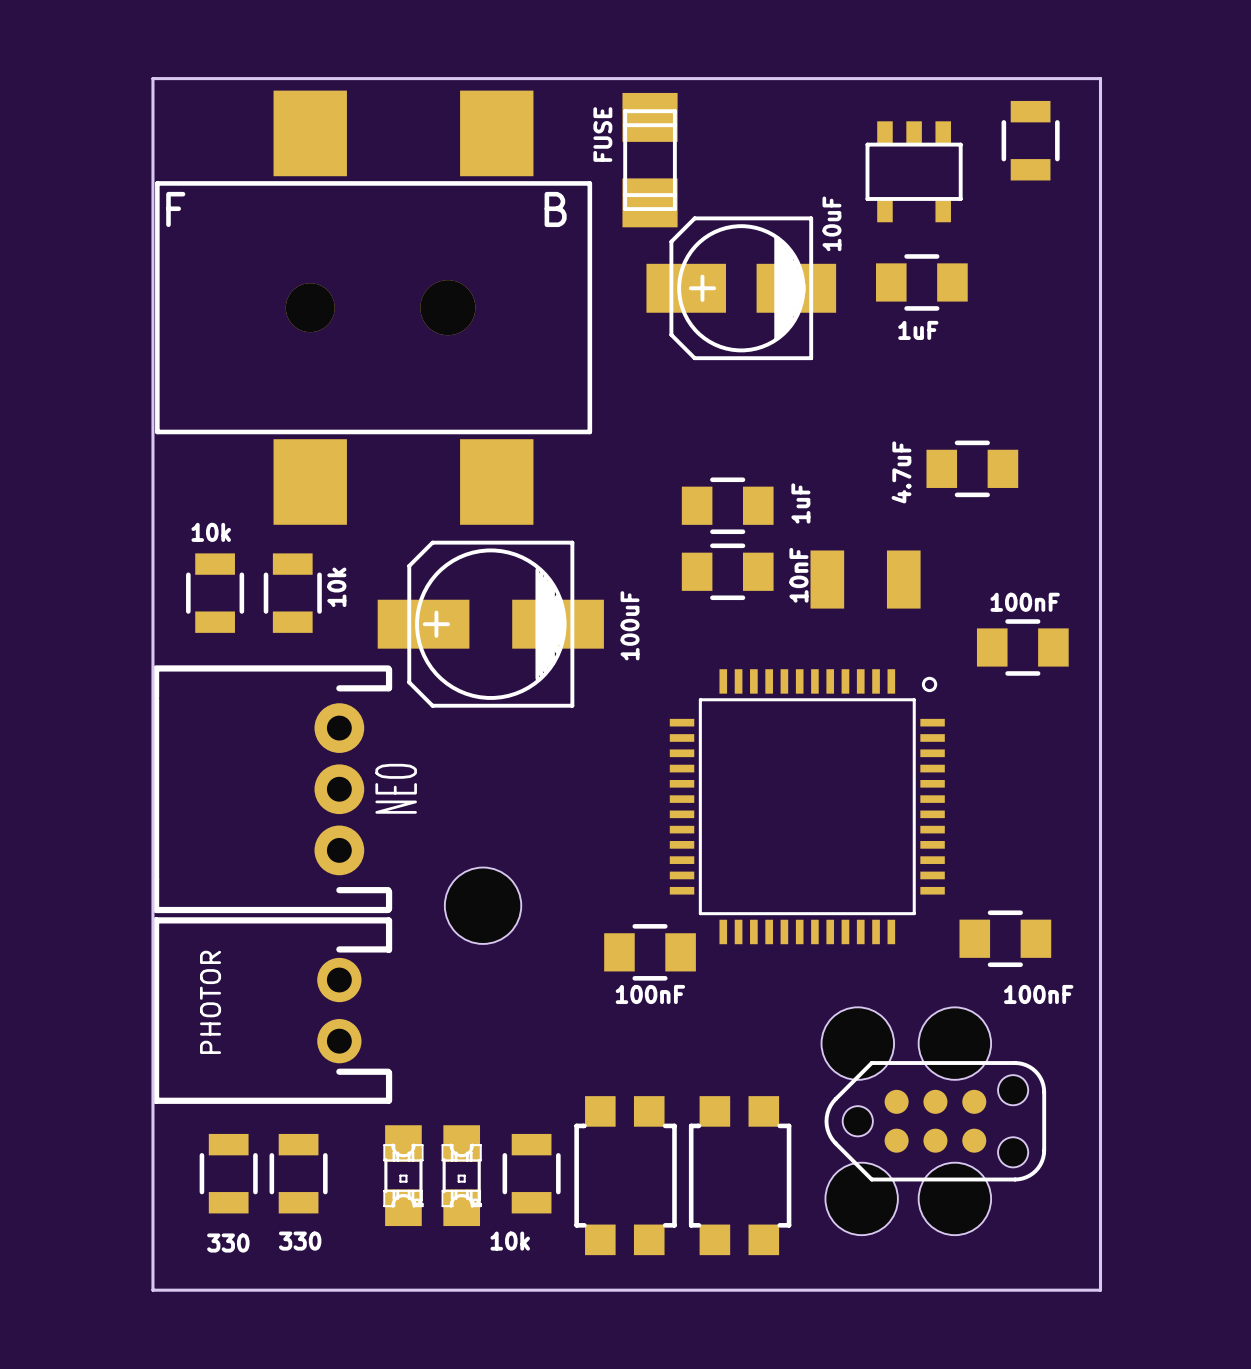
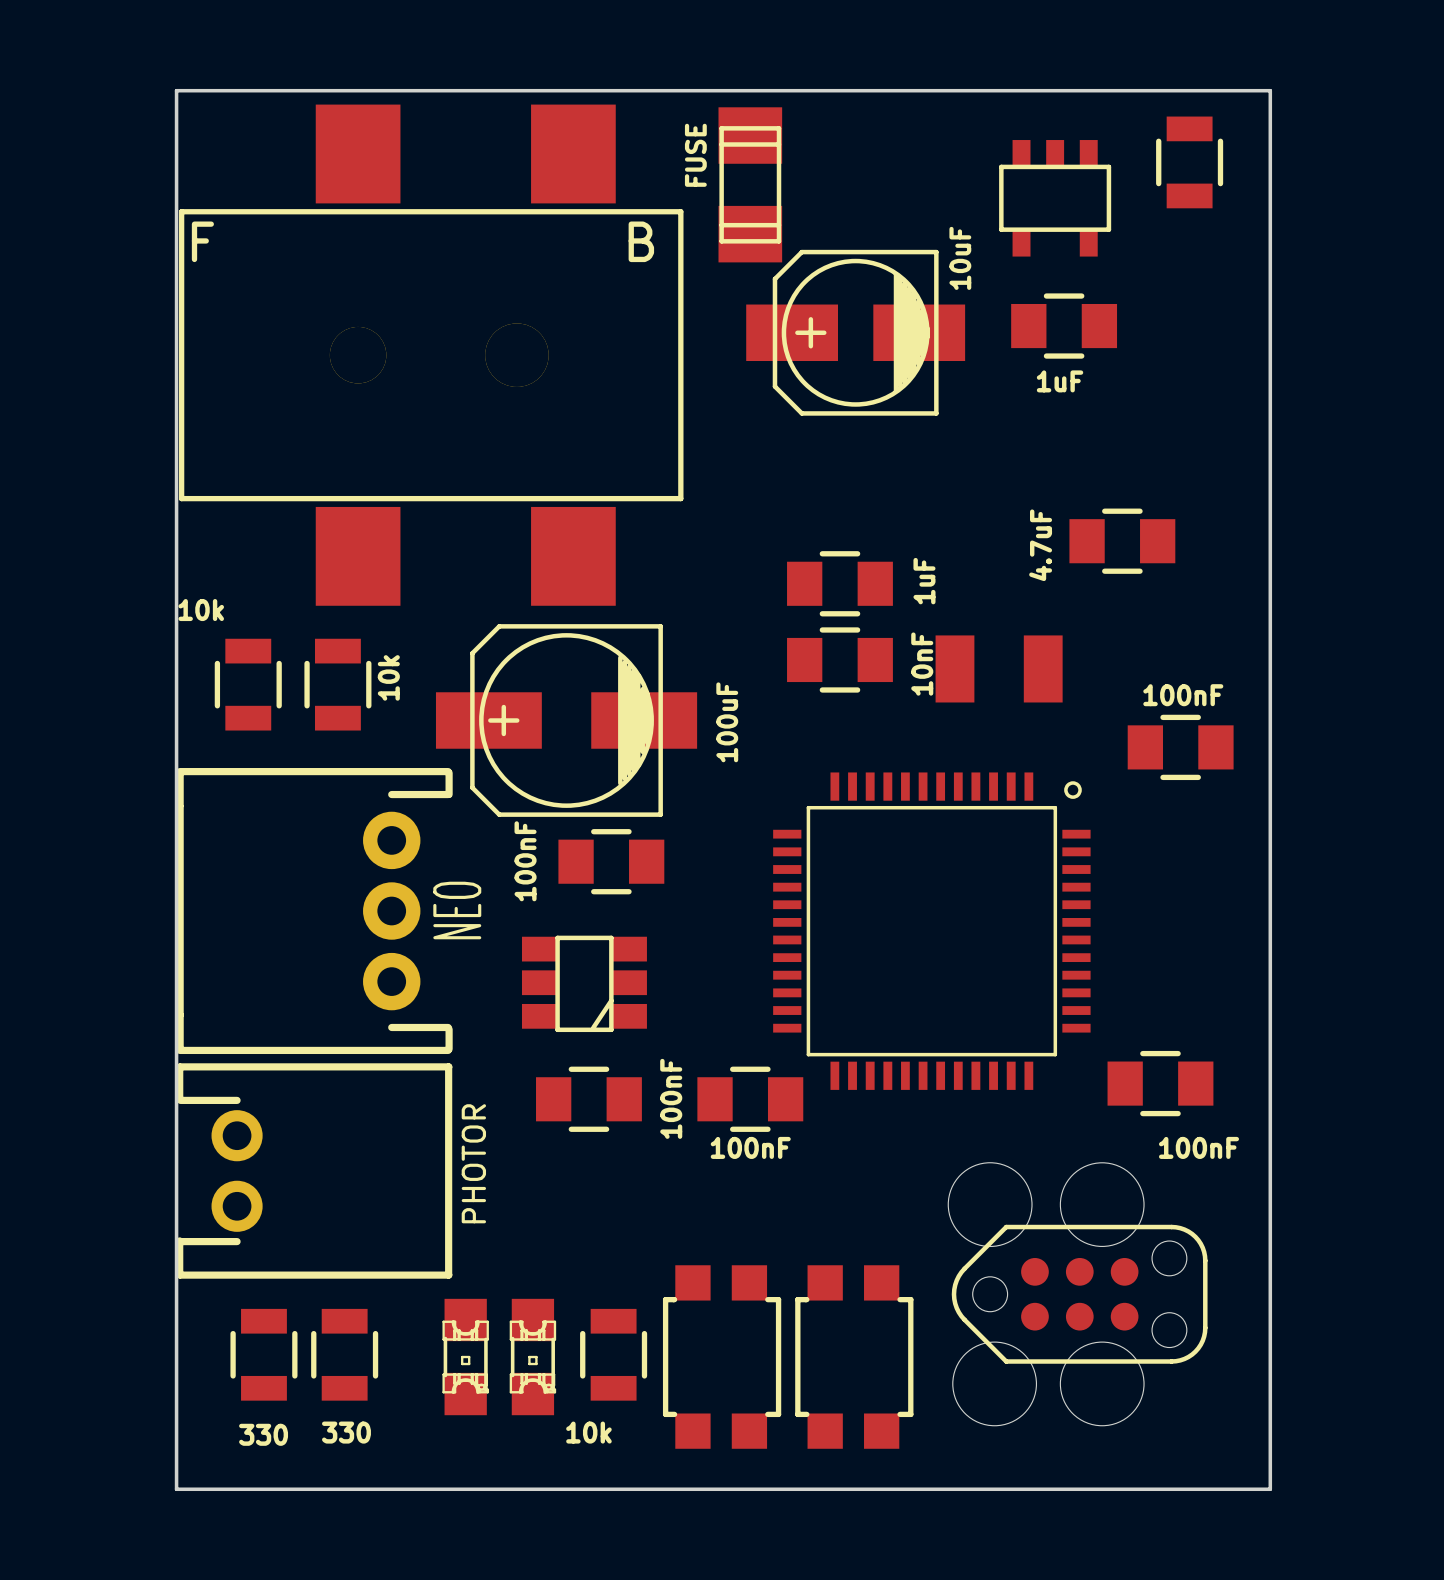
part value position: 10k (211, 532) -> 10k (201, 610)
part: none -> 100nF (611, 861)
part: none -> (584, 983)
part: (483, 905) -> none
part: none -> 100nF (588, 1099)
part value position: PHOTOR (210, 1002) -> PHOTOR (473, 1163)
part rotation: 0° (272, 1010) -> 180° (314, 1170)

